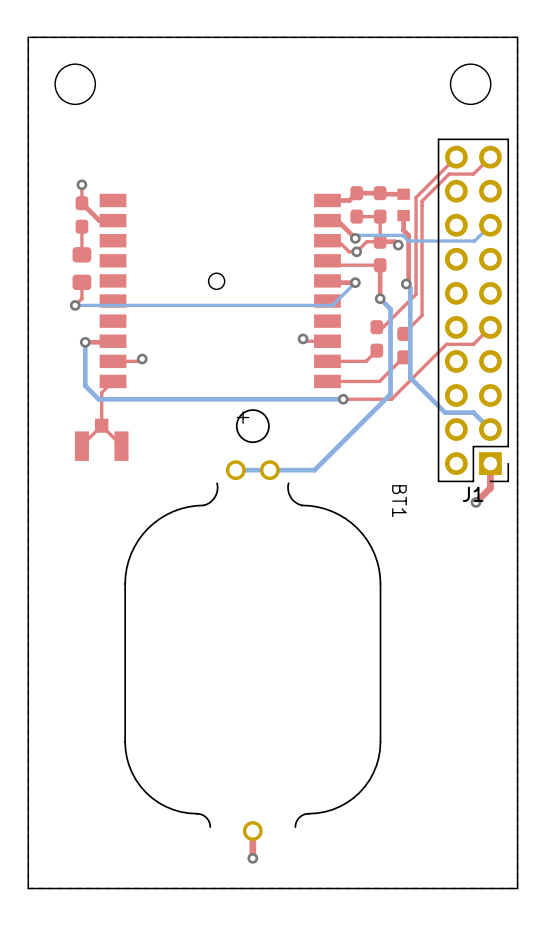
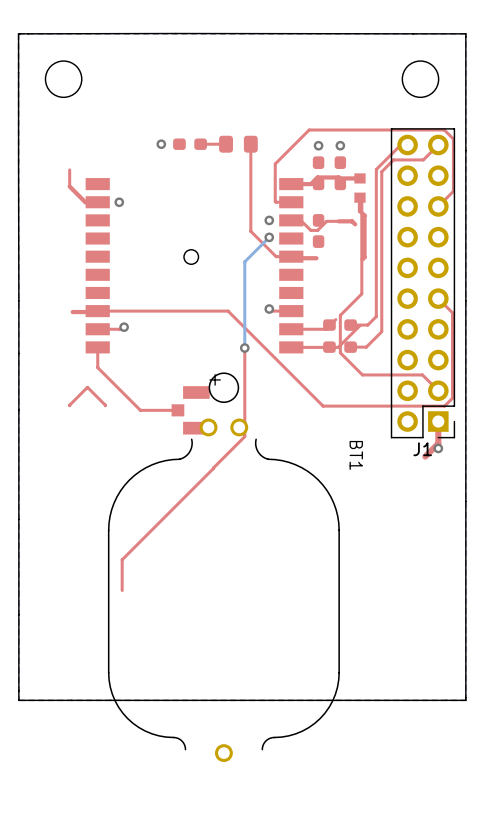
board edge: (517, 37) (517, 888) (28, 888) (28, 37) (517, 37) -> (175, 33) (465, 33) (465, 700) (18, 700) (18, 33) (175, 33)
via: none -> (161, 144)
part: none -> (190, 144)
top track: none -> (226, 144) (200, 144)
top track: none -> (250, 144) (250, 231) (276, 256) (291, 256)
via: none -> (318, 145)
via: none -> (340, 145)
top track: (456, 157) (416, 197) (416, 294) (383, 327) (376, 327) -> (407, 144) (400, 144) (376, 169) (376, 316) (367, 325) (350, 325)
top track: (473, 173) (449, 174) (422, 201) (422, 315) (403, 333) -> (423, 159) (393, 159) (381, 171) (381, 331) (366, 347) (350, 347)
via: (81, 184) -> none
part: none -> (318, 173)
part: none -> (340, 173)
part: (356, 204) -> none
part: (380, 204) -> none
part: (81, 214) -> none
top track: (356, 216) (380, 216) (380, 241) -> none
via: none -> (119, 202)
top track: none -> (291, 202) (275, 201) (275, 163) (309, 129) (444, 129) (453, 139) (453, 191) (438, 206)
top track: (337, 220) (355, 238) -> none
top track: none -> (361, 203) (361, 293) (340, 315) (340, 352) (362, 374) (422, 374) (438, 390)
bottom track: (490, 225) (474, 241) (408, 241) (402, 235) (358, 235) (355, 238) -> none
top track: (81, 226) (81, 254) -> none
via: (355, 238) -> none
via: none -> (269, 220)
via: (398, 245) -> none
via: (356, 251) -> none
part position: (380, 253) -> (318, 231)
bottom track: none -> (269, 237) (244, 261) (244, 348)
via: none -> (269, 237)
top track: (331, 265) (380, 265) (380, 298) -> none
part rotation: 0° (81, 268) -> 90° clockwise (238, 144)
part position: (81, 268) -> (238, 144)
top track: (81, 282) (81, 298) (75, 305) -> none
bottom track: (355, 282) (332, 305) (75, 305) -> none
via: (355, 282) -> none
bottom track: (406, 283) (410, 288) (410, 377) (445, 412) (473, 412) (490, 429) -> none
via: (406, 283) -> none
bottom track: (380, 298) (390, 309) (390, 394) (314, 470) (235, 470) -> none
via: (380, 298) -> none
via: (75, 305) -> none
top track: (490, 327) (473, 344) (446, 344) (391, 399) (343, 399) (345, 401) -> (438, 298) (452, 312) (452, 398) (444, 406) (323, 406) (228, 311) (97, 311)
part: (376, 338) -> none
bottom track: (85, 342) (85, 385) (98, 399) (343, 399) -> none
via: (85, 342) -> none
part: (403, 345) -> none
part: none -> (340, 325)
top track: (113, 381) (101, 392) (101, 425) -> (97, 347) (97, 367) (140, 410) (177, 410)
part: none -> (340, 347)
top track: none -> (244, 348) (244, 436) (122, 559) (122, 590)
via: none -> (244, 348)
via: (343, 399) -> none
part rotation: 0° (101, 439) -> 90° counterclockwise (190, 410)
part position: (101, 439) -> (190, 410)
via position: (476, 502) -> (438, 448)
top track: (252, 831) (252, 858) -> none
via: (252, 858) -> none

